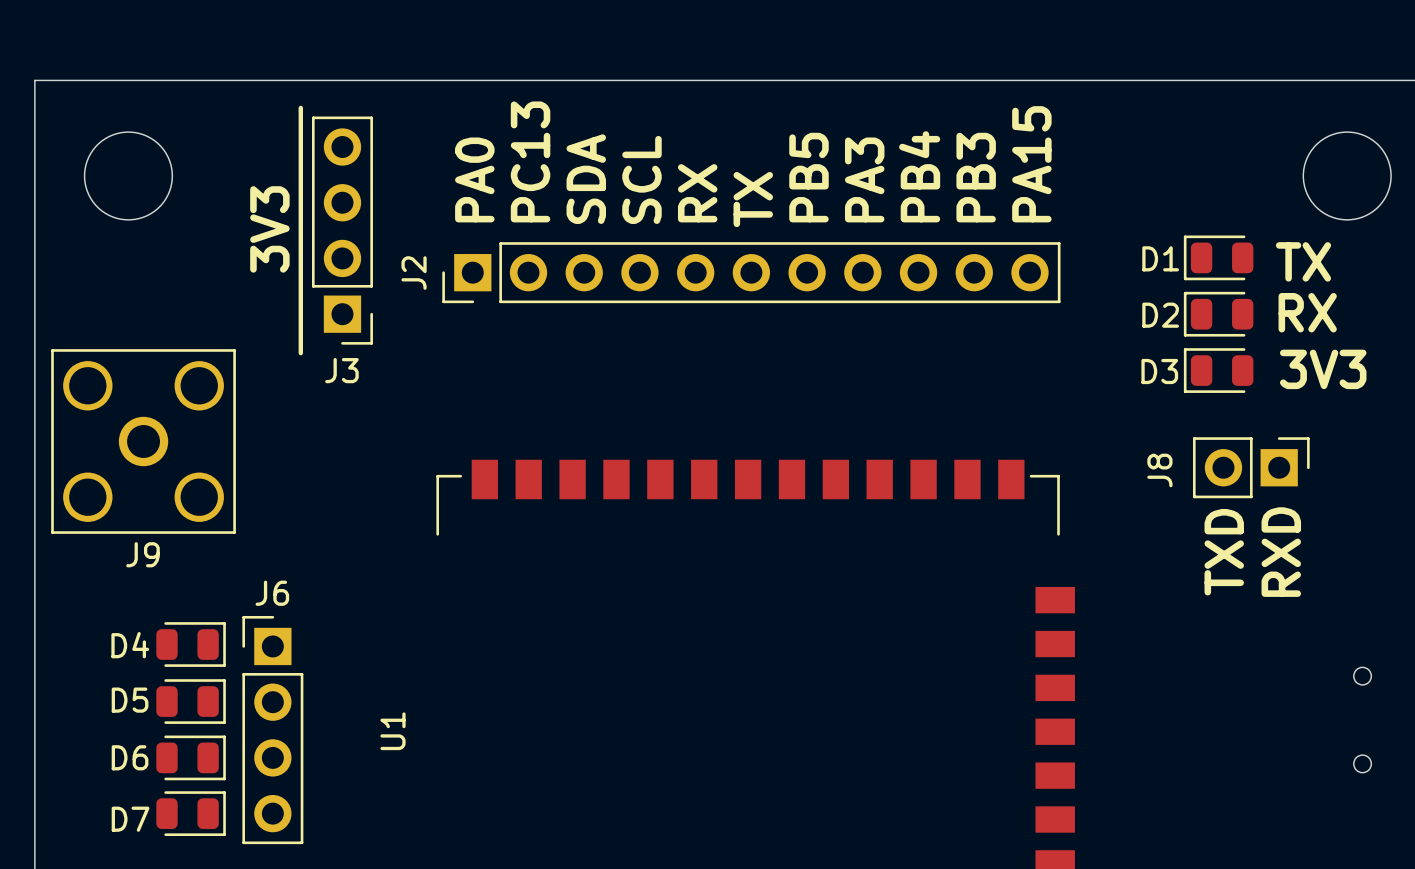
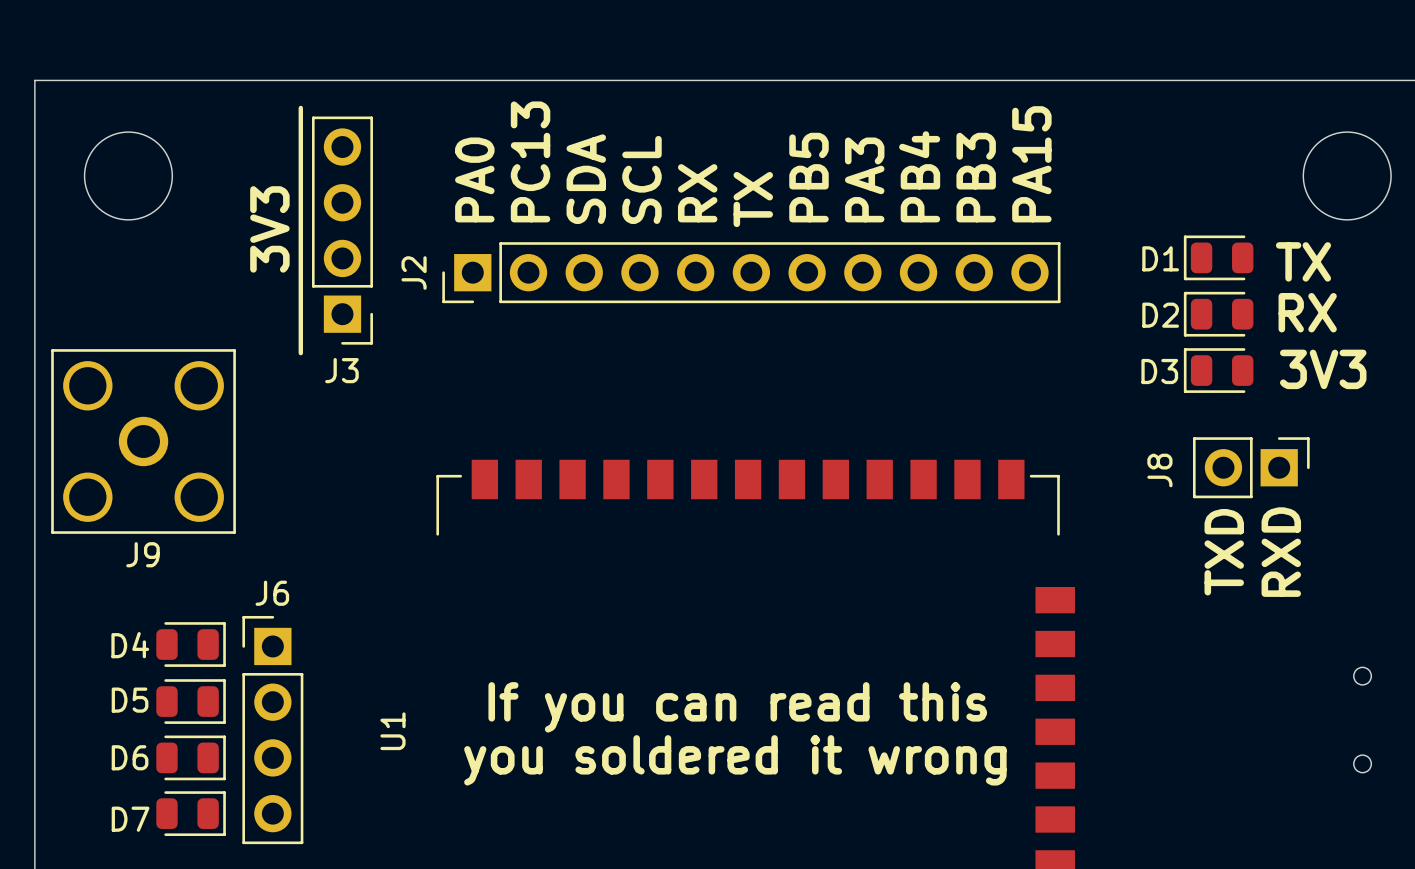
text: none -> If you can read this (737, 707)
text: none -> you soldered it wrong (735, 760)

